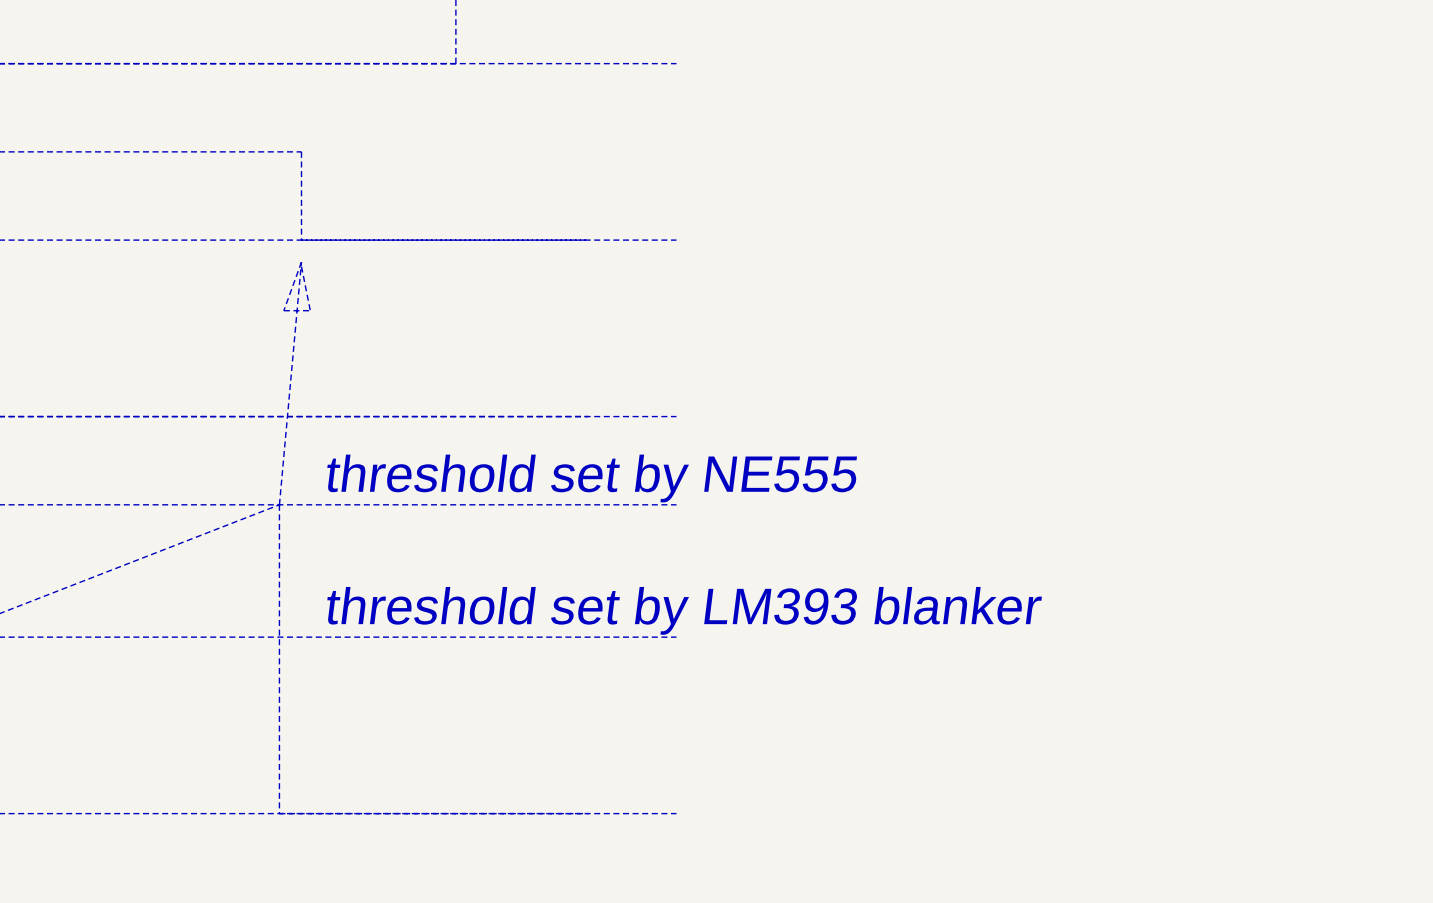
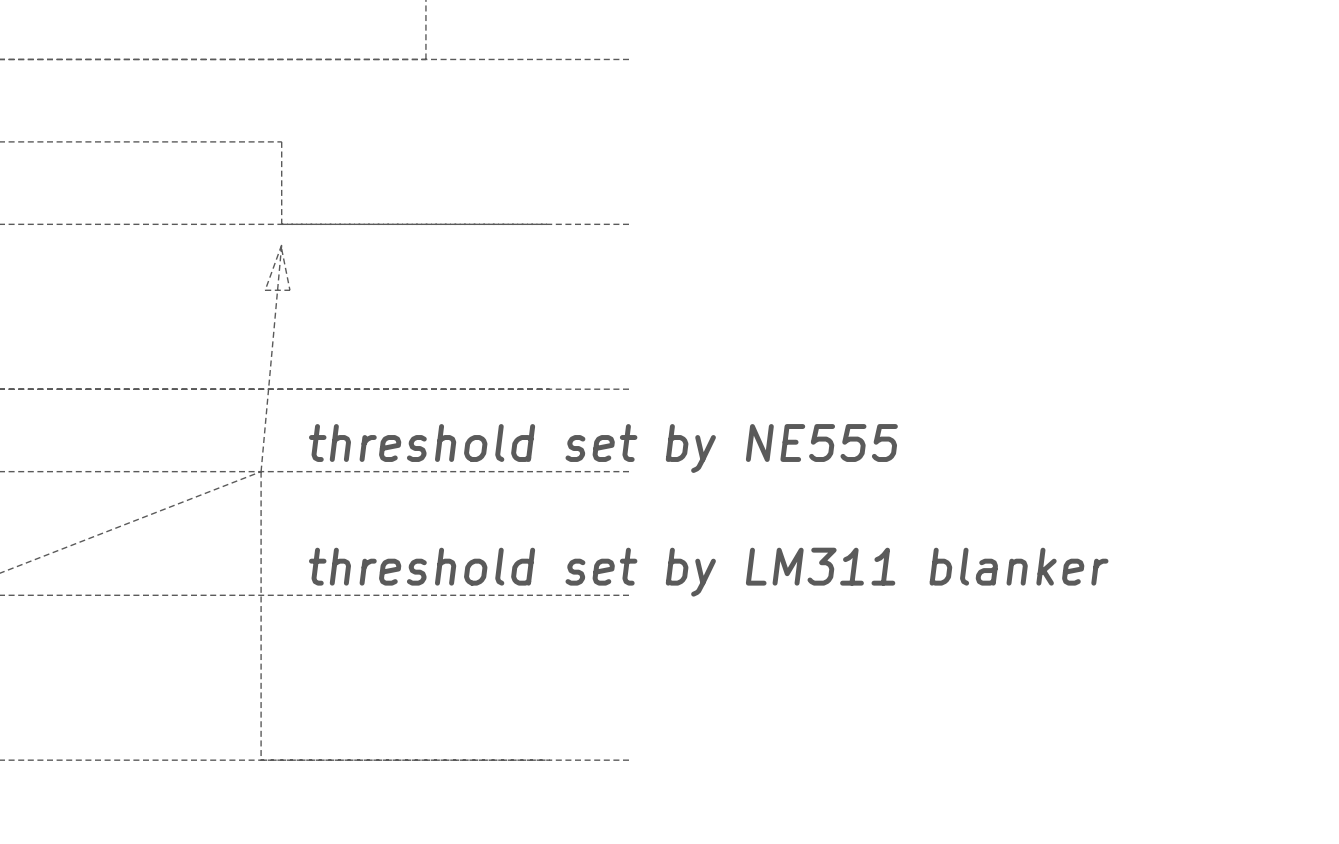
text: threshold set by LM393 blanker (684, 610) -> threshold set by LM311 blanker (708, 572)

